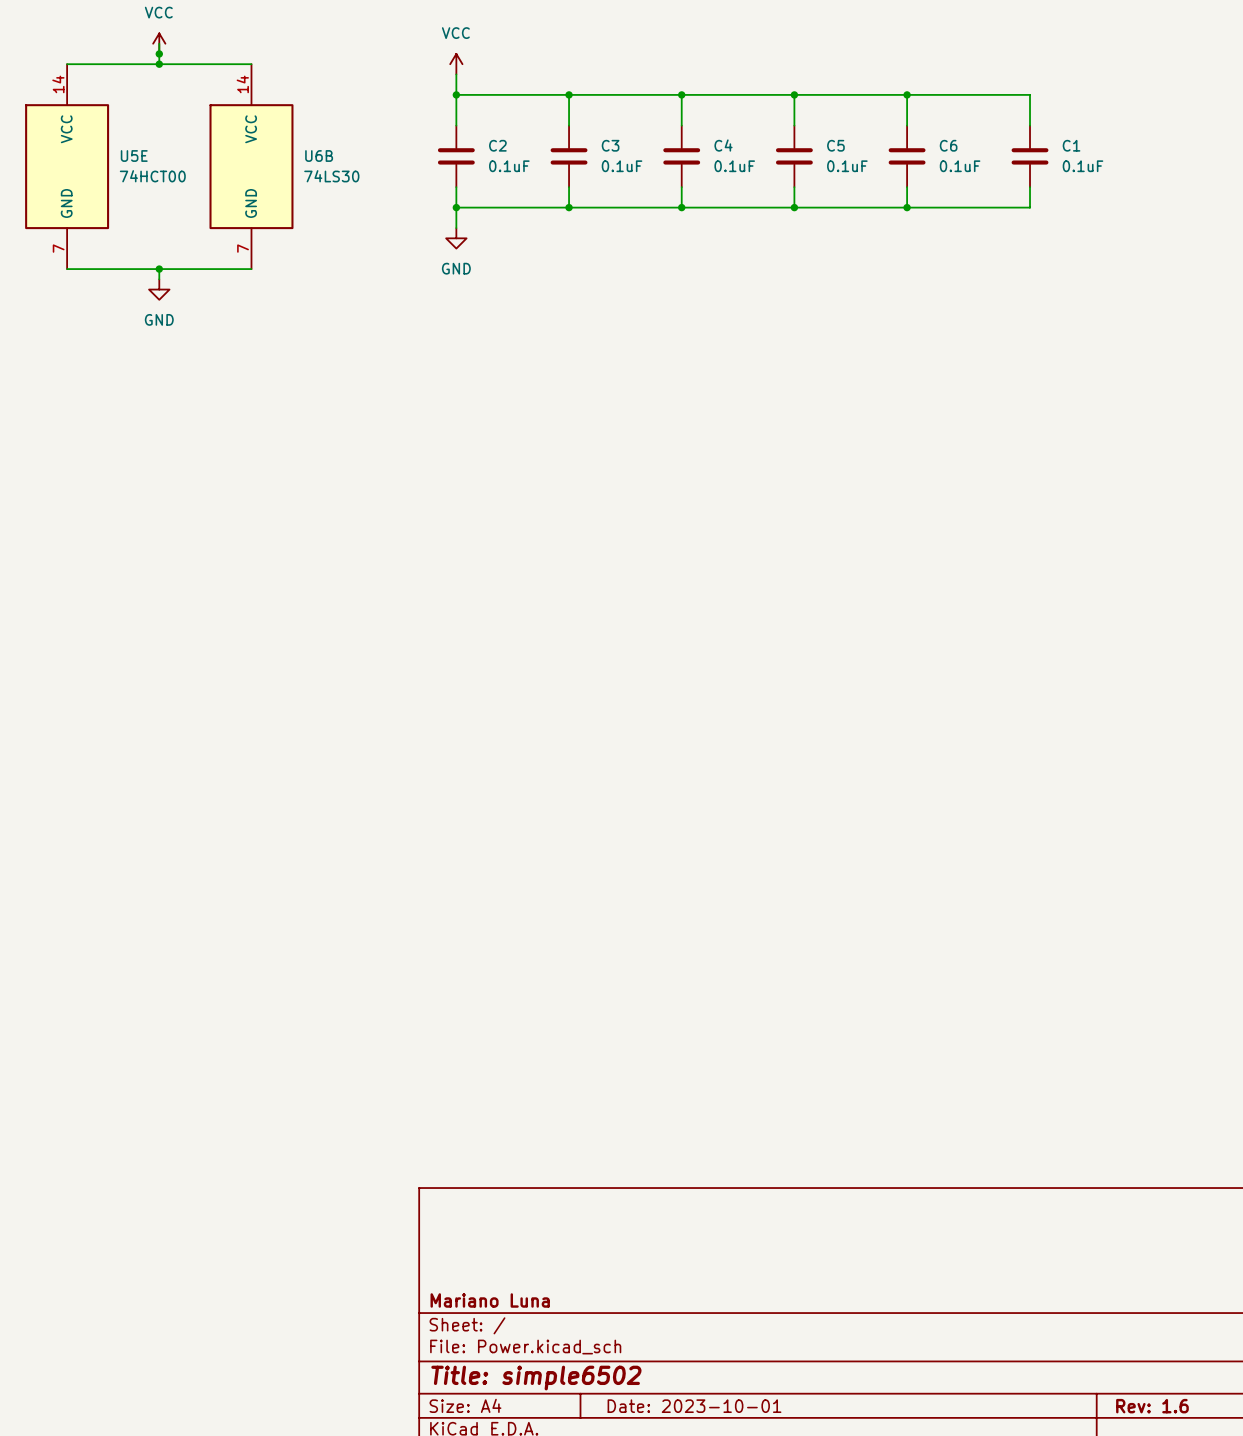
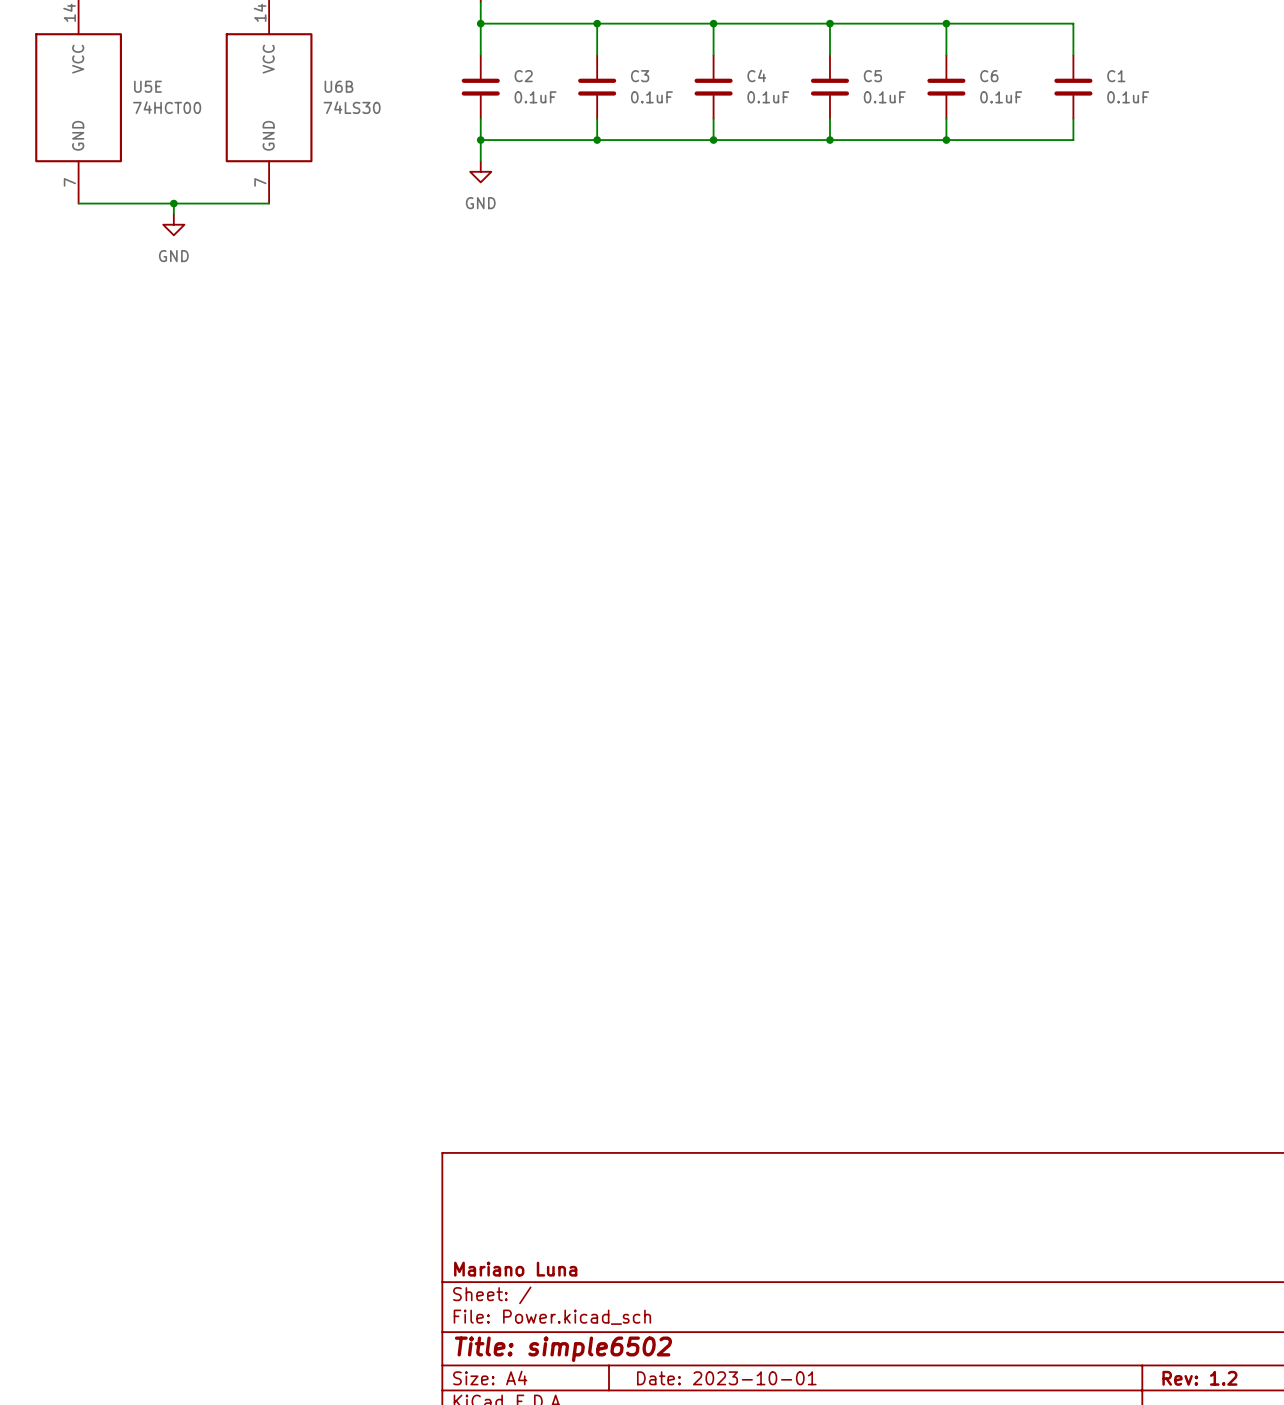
title block: Rev: 1.6 (1152, 1406) -> Rev: 1.2 (1199, 1378)

